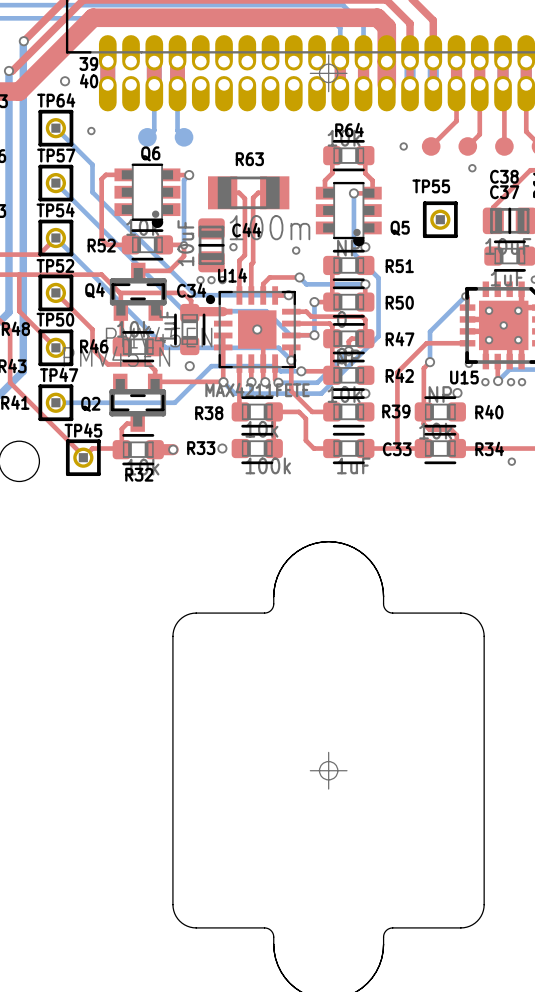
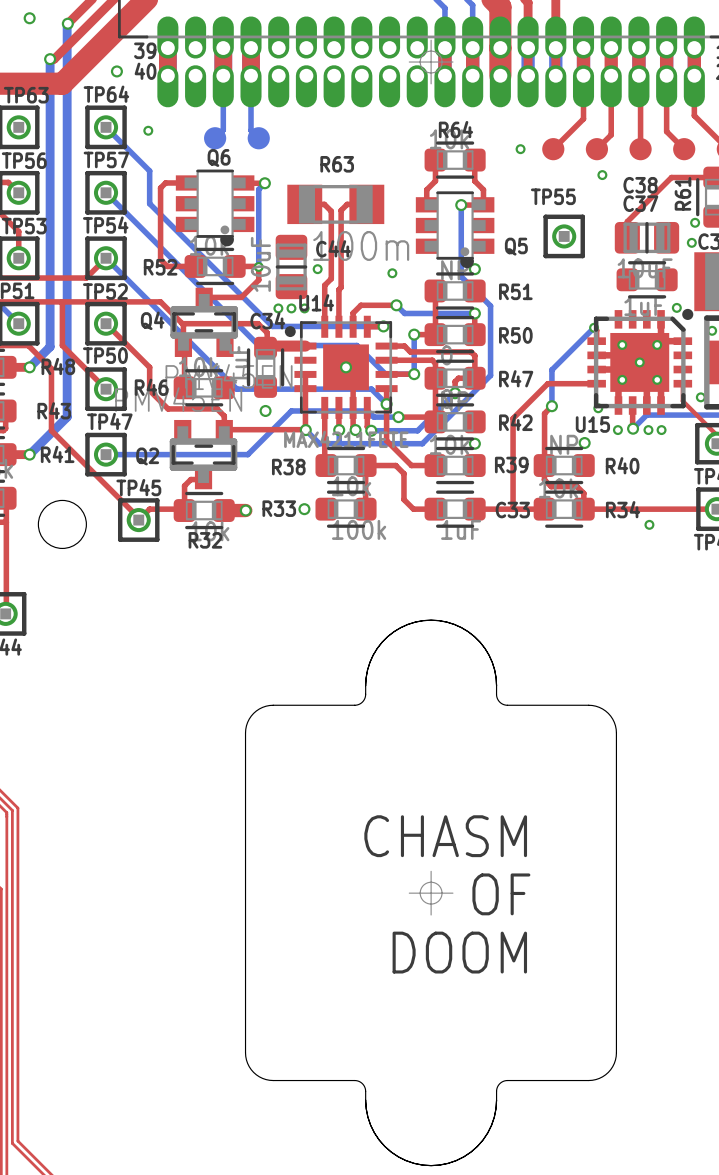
text: none -> CHASM (445, 836)
text: none -> OF (501, 894)
text: none -> DOOM (459, 952)

